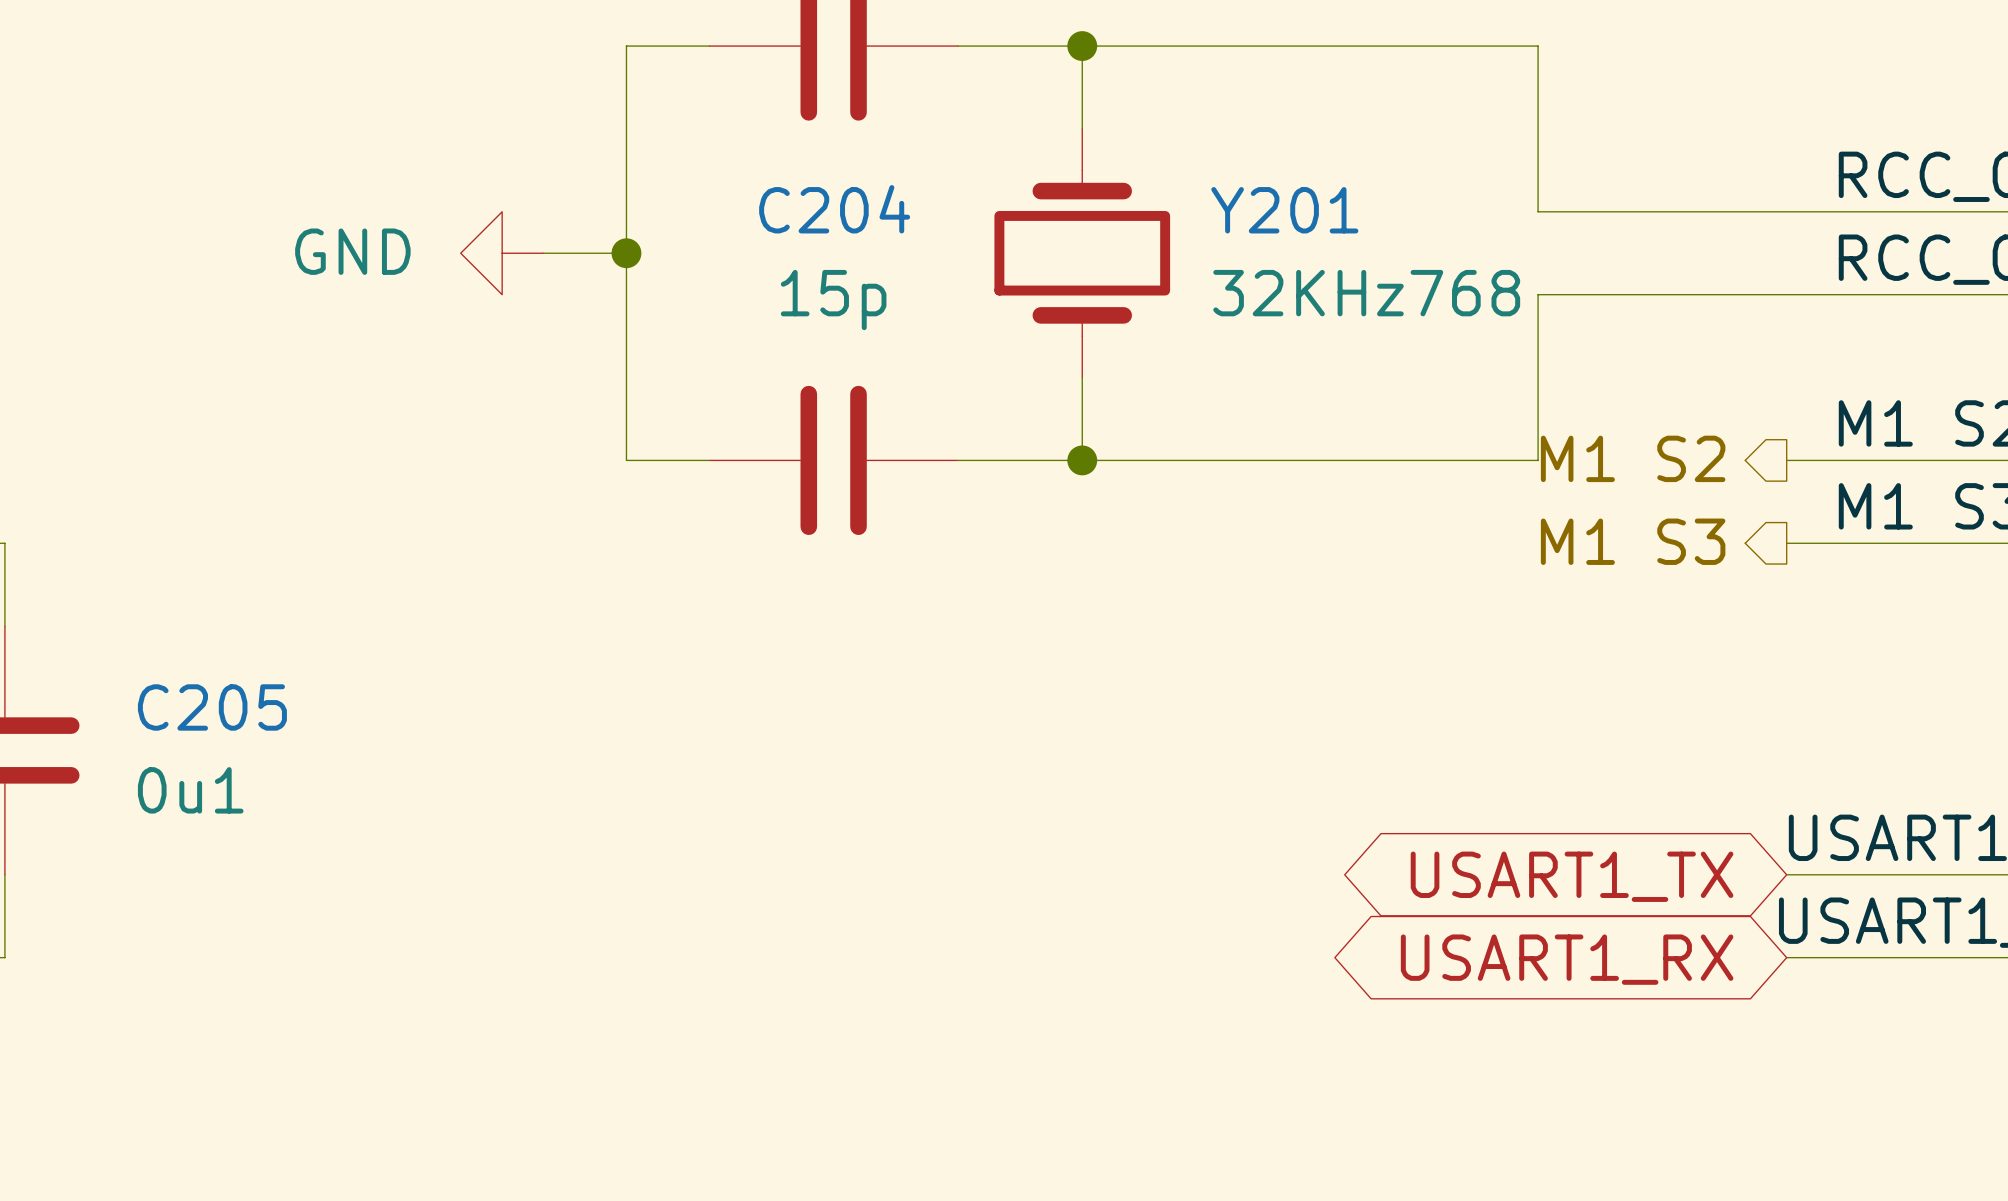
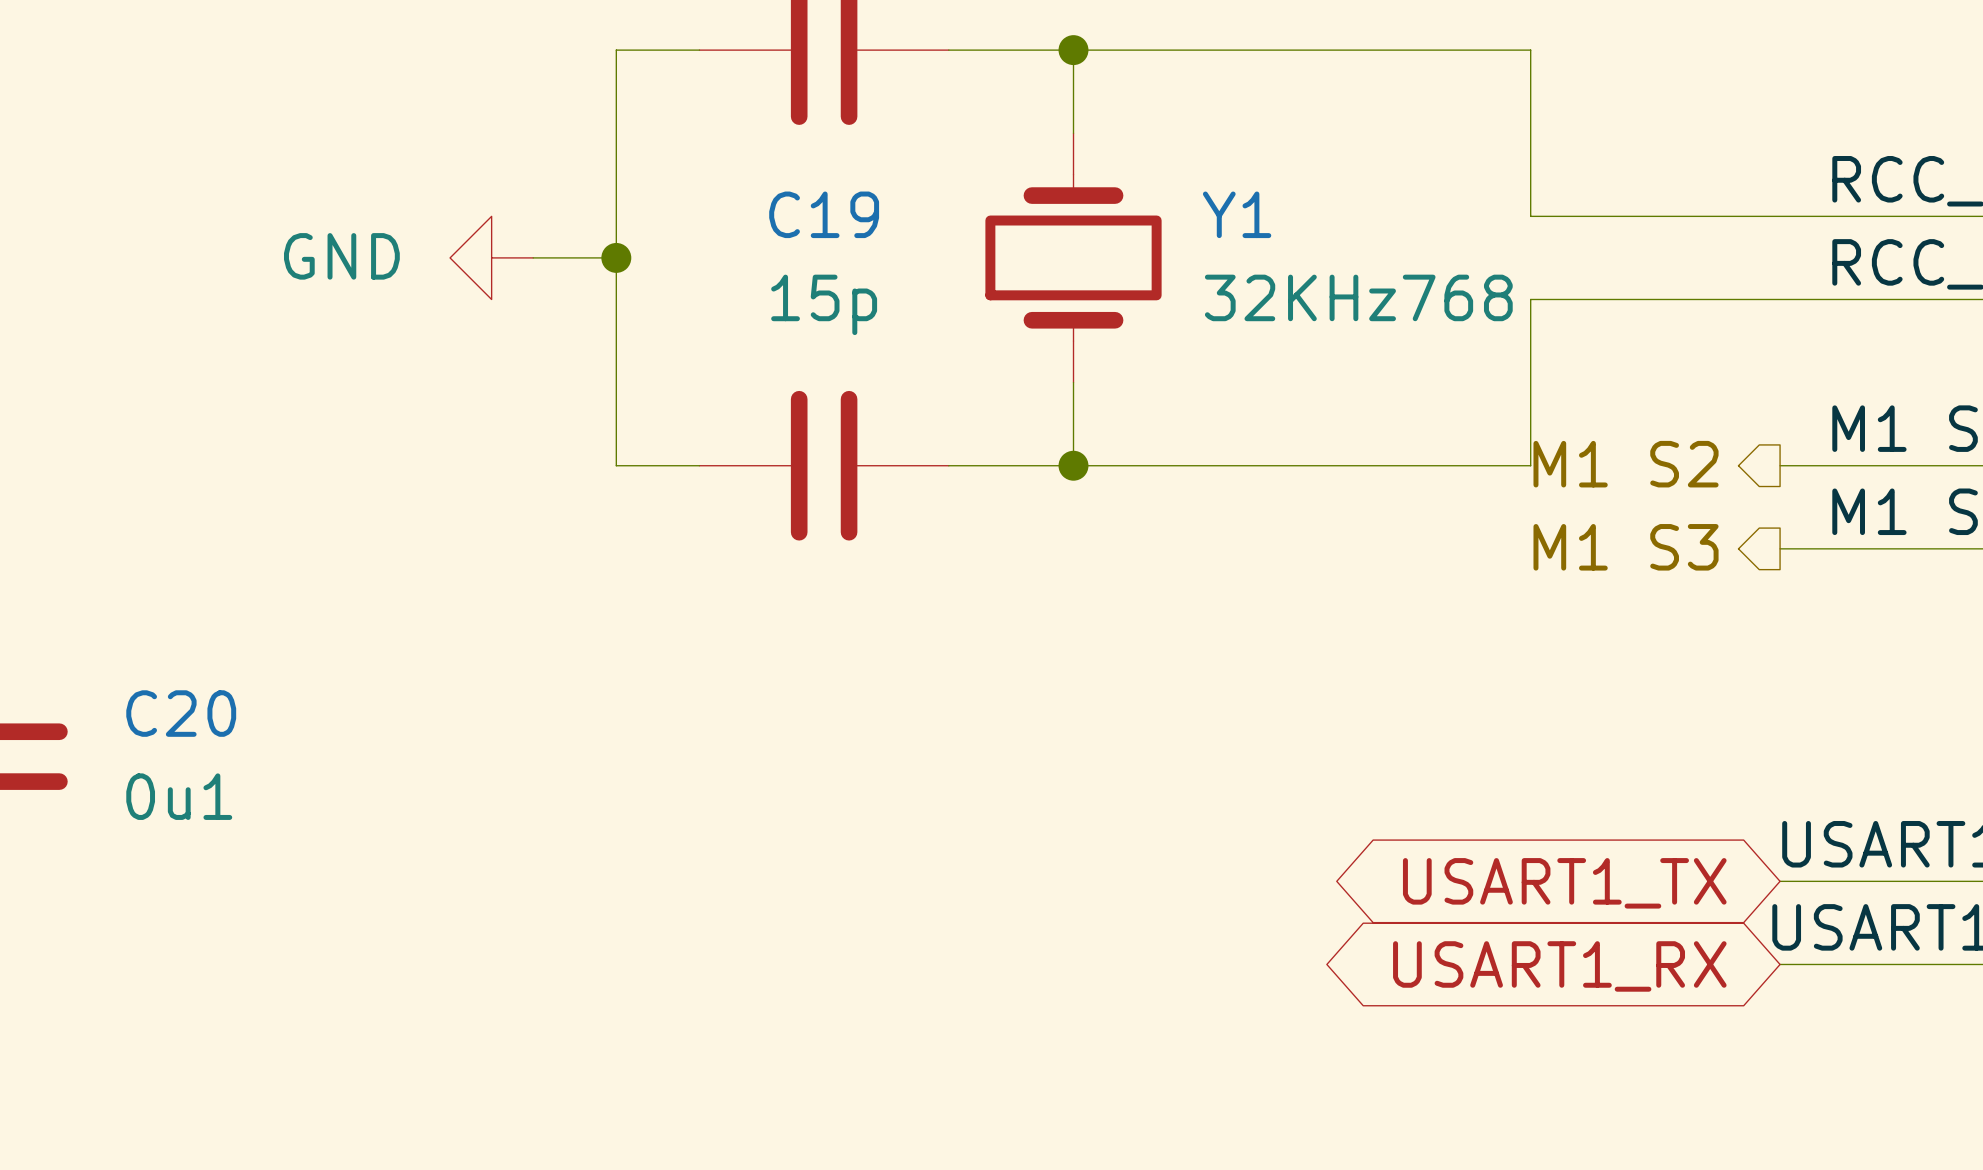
C204 name: C204 (834, 209) -> C19 (824, 214)
Y201 name: Y201 (1284, 210) -> Y1 (1237, 214)
C205 name: C205 (212, 707) -> C20 (181, 713)

